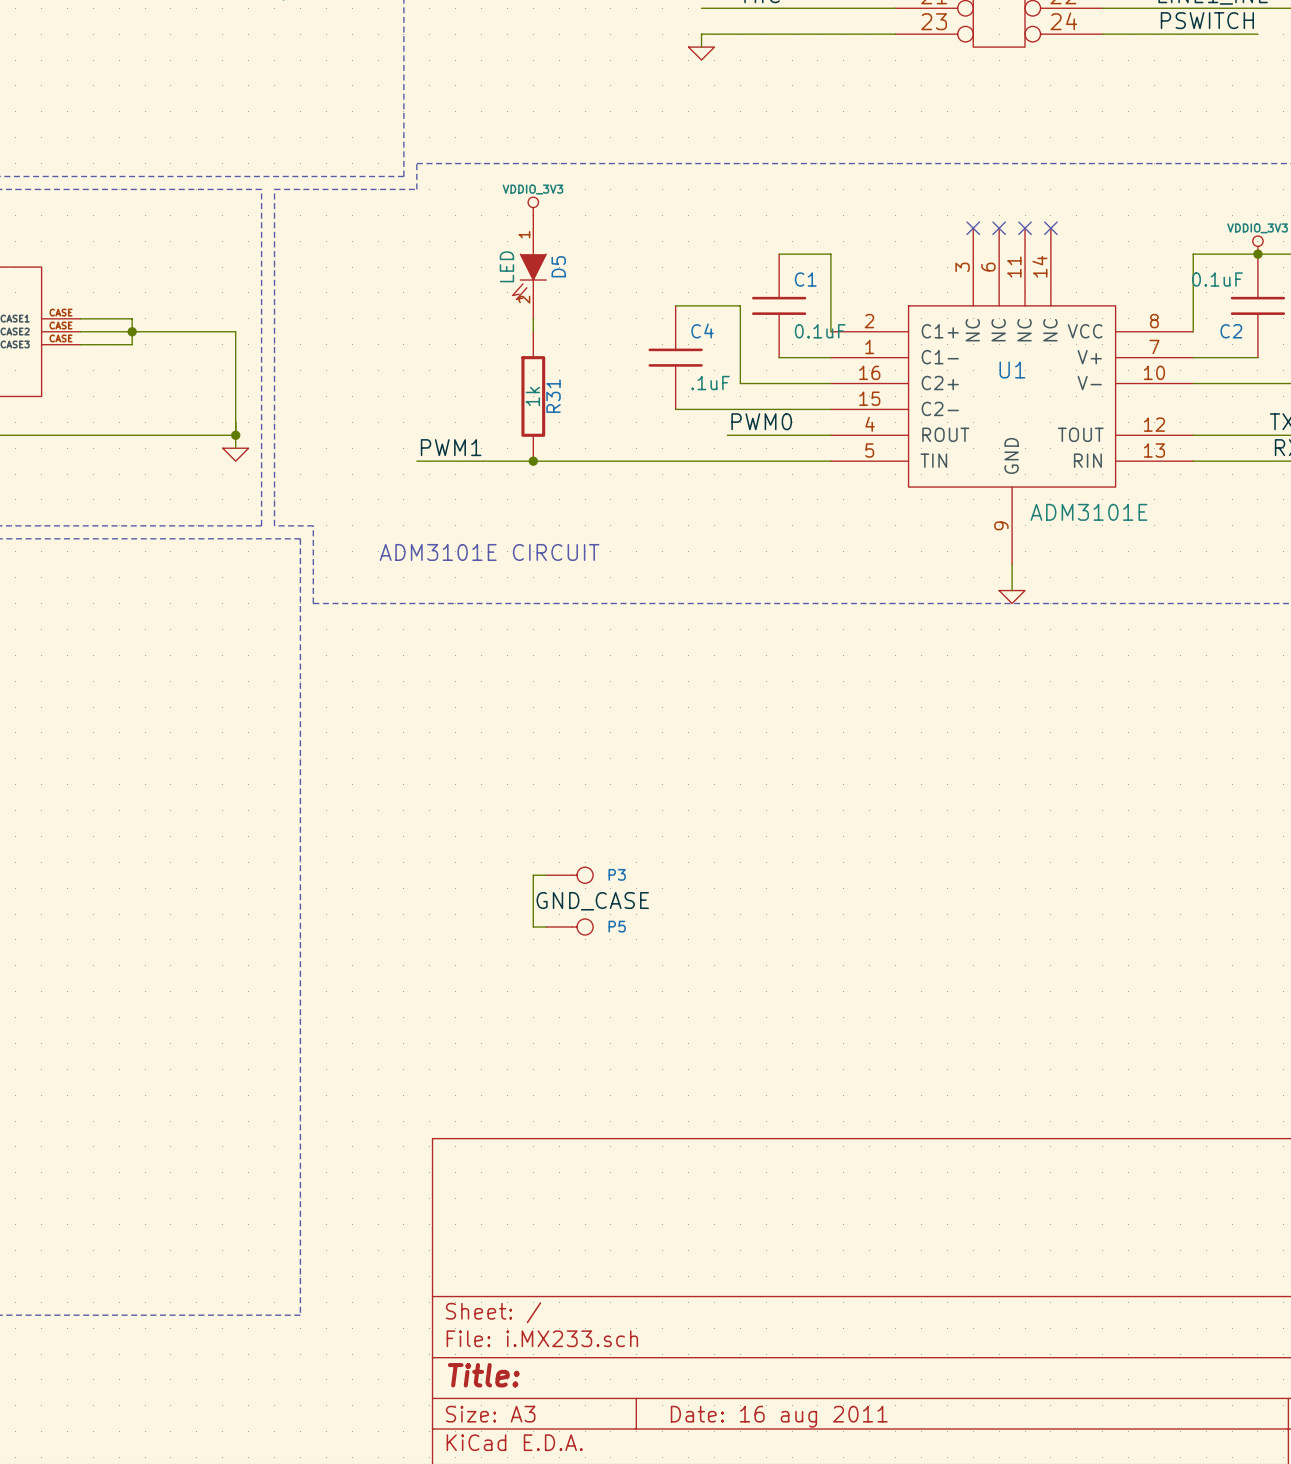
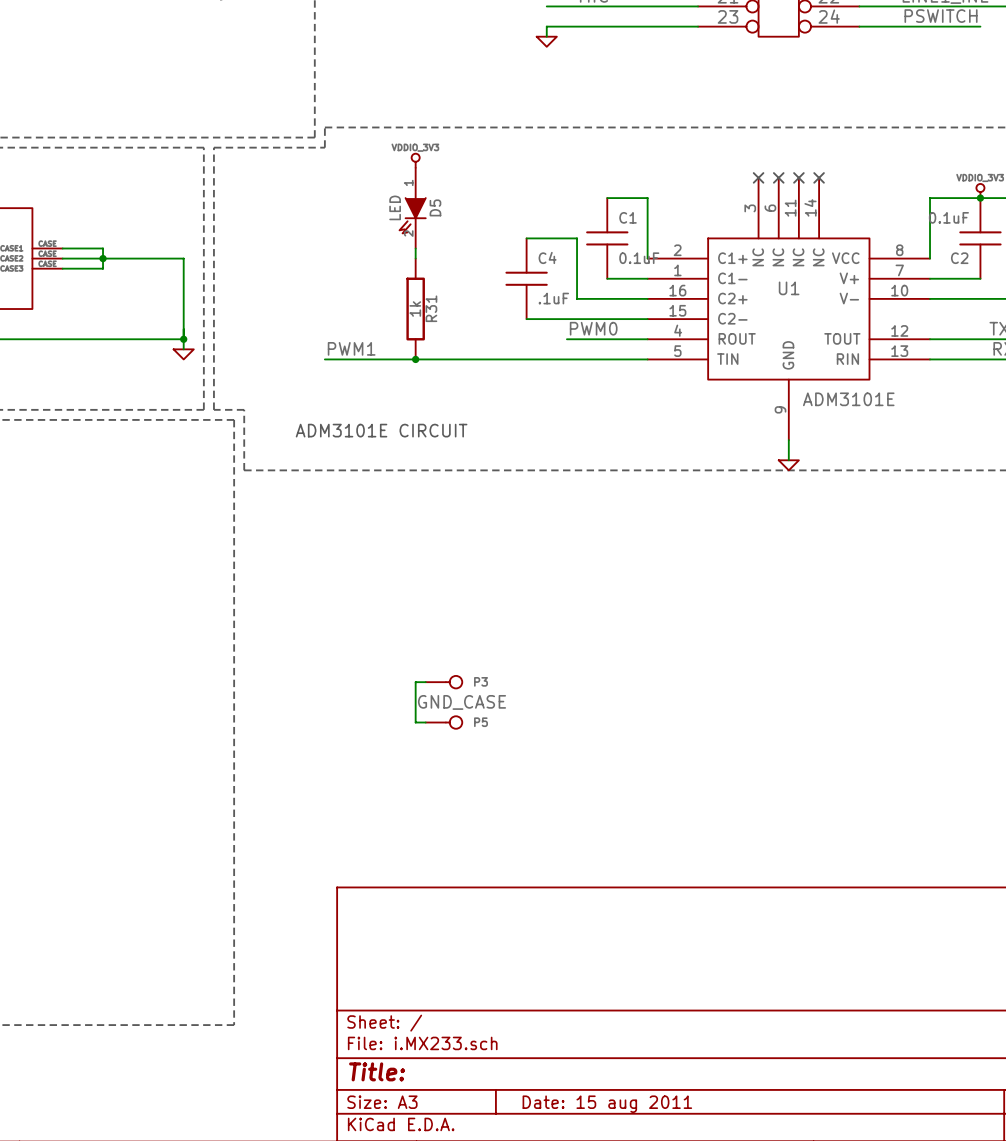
title block: Date: 16 aug 2011 (779, 1416) -> Date: 15 aug 2011 (607, 1104)

